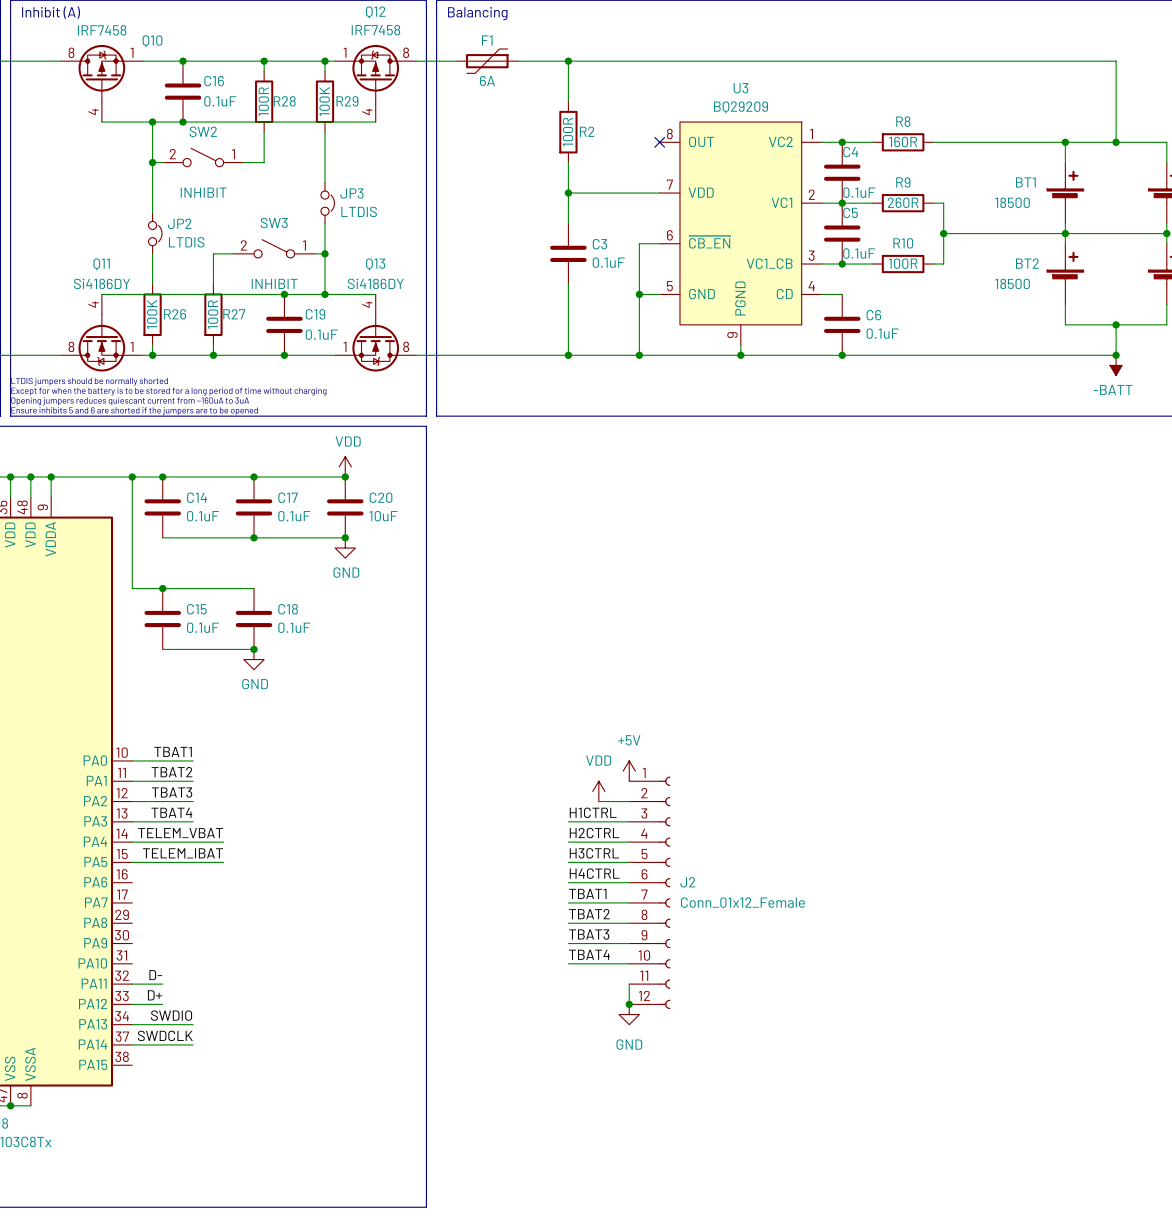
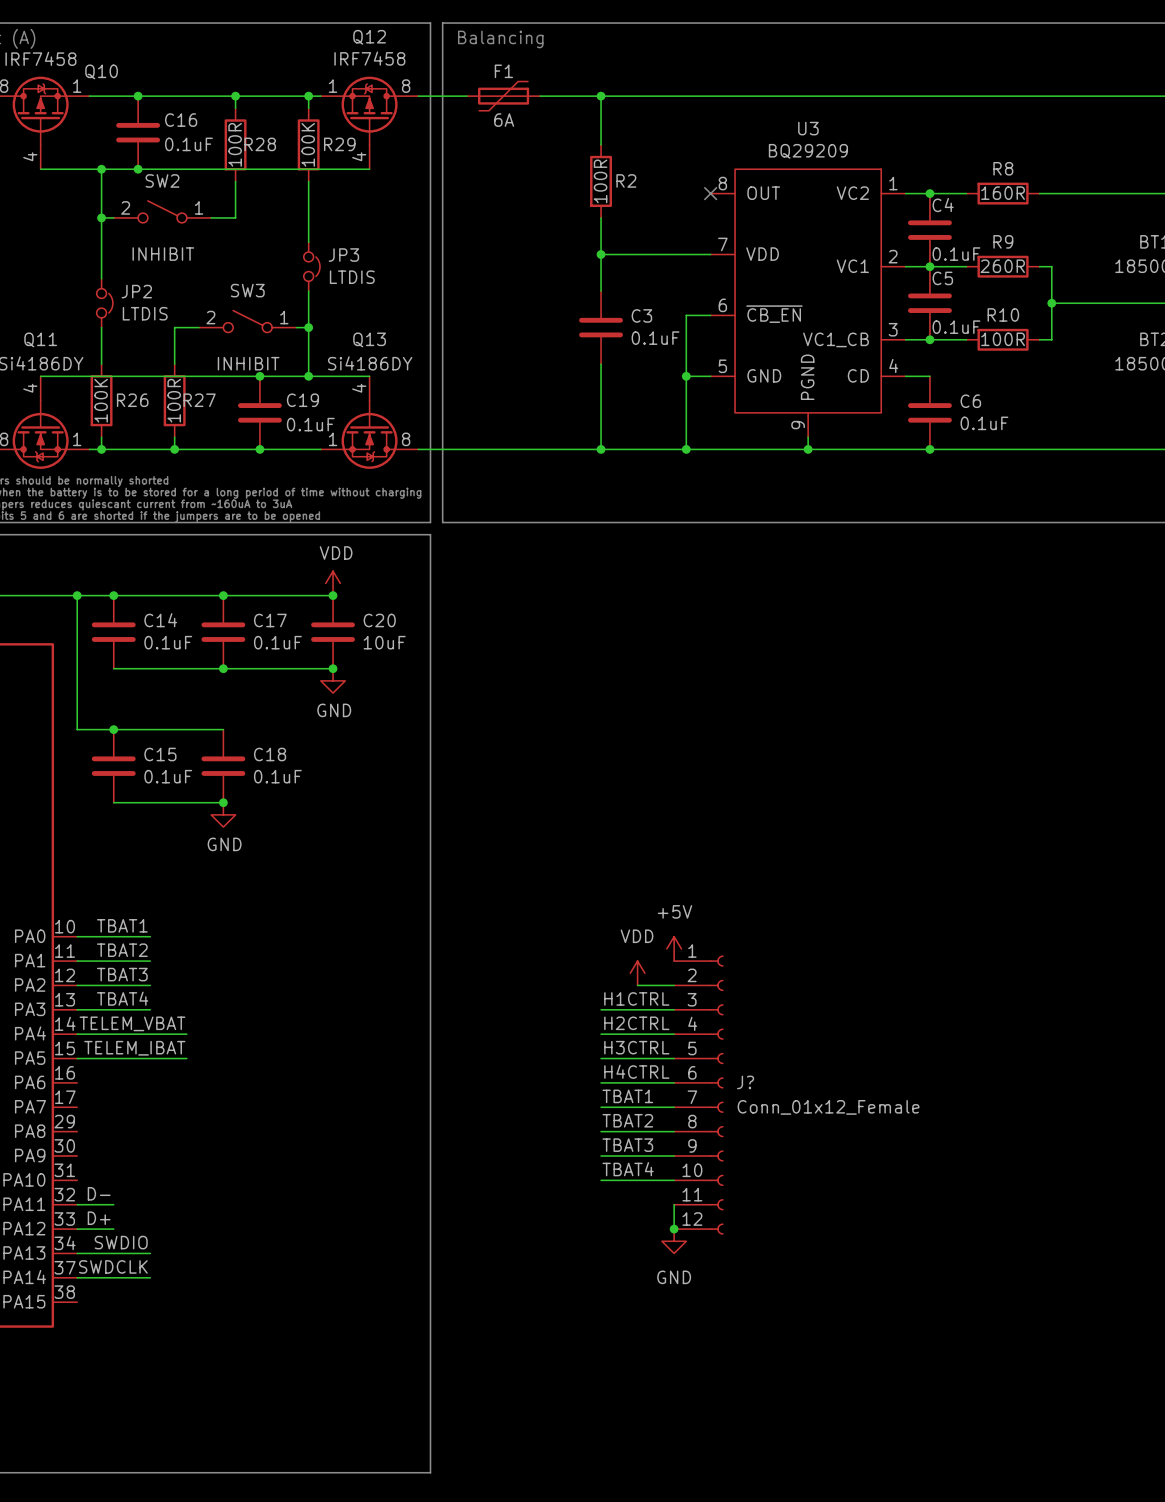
J2 name: J2 (687, 882) -> J? (745, 1082)

